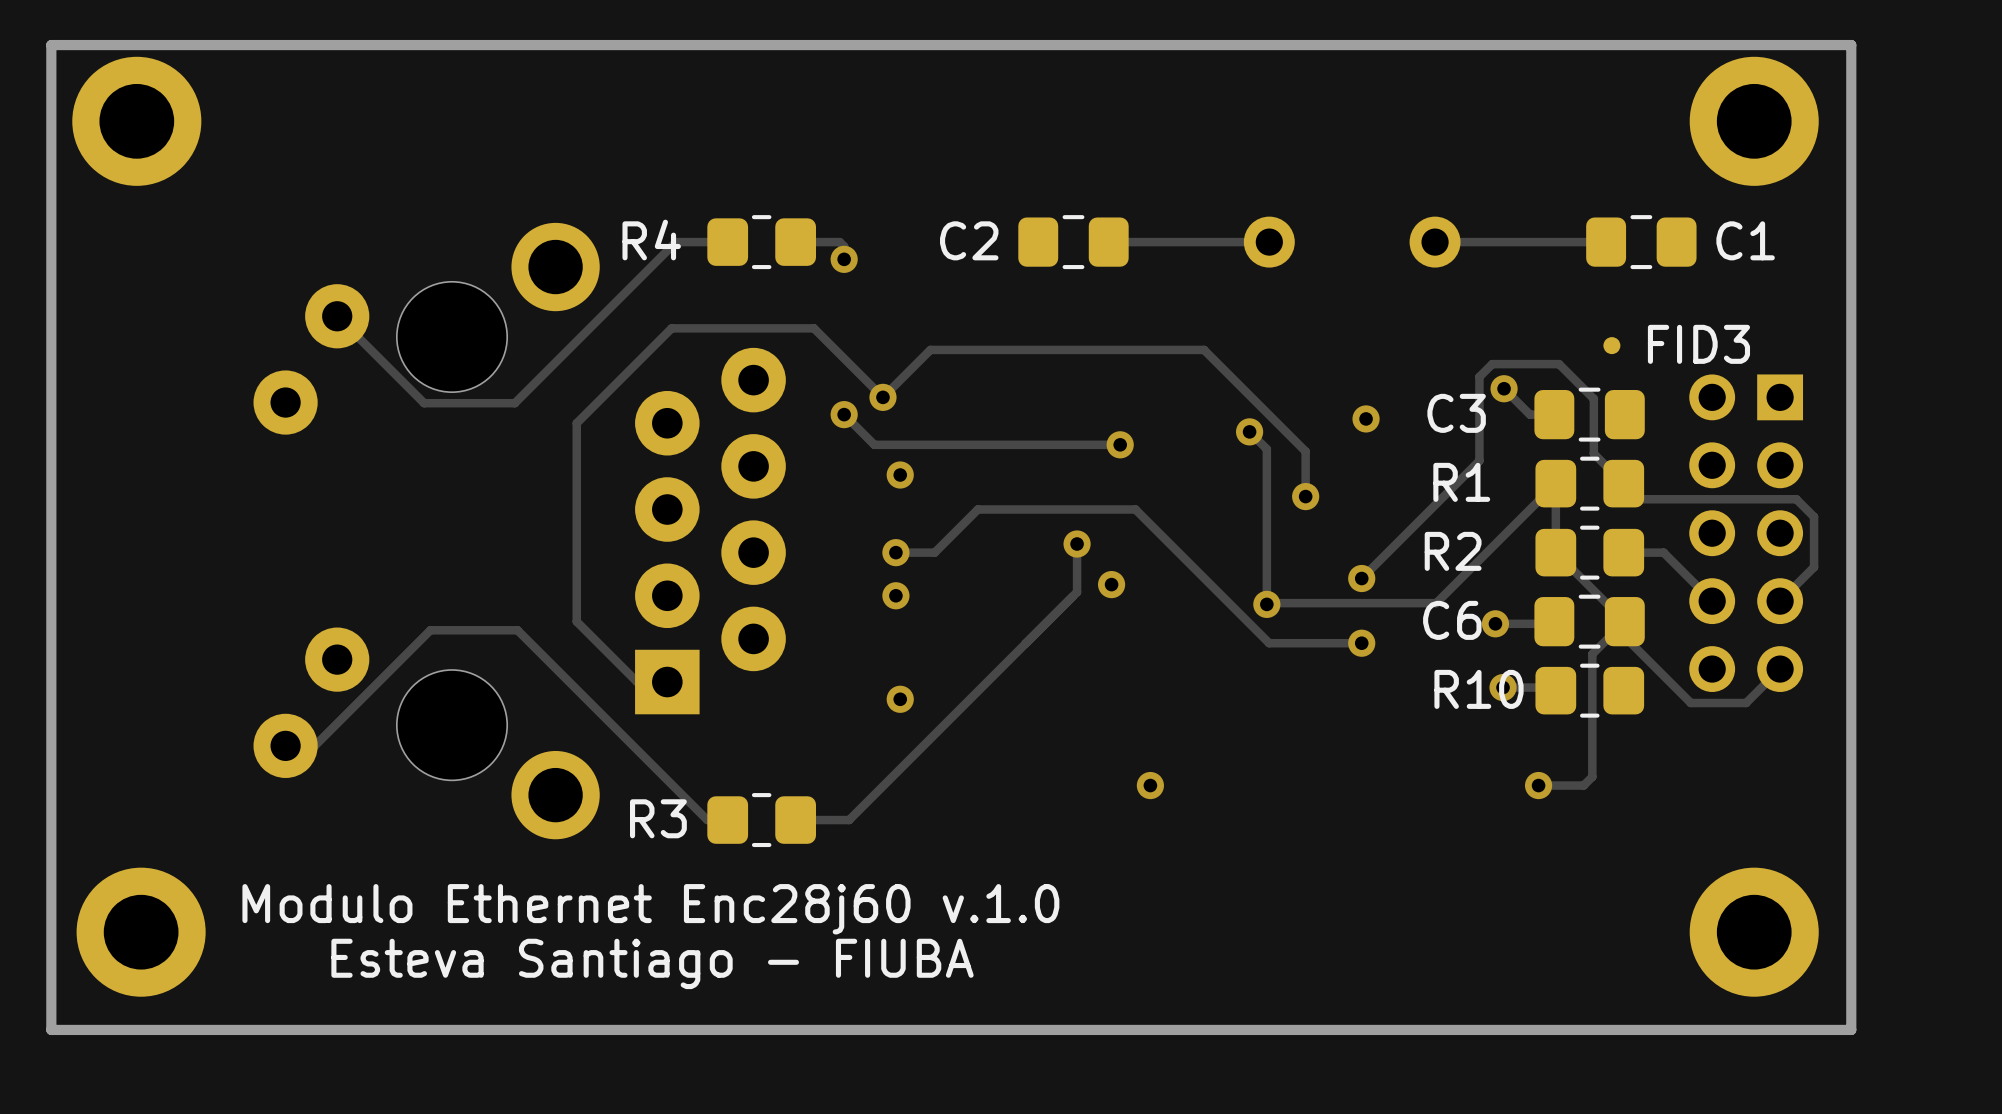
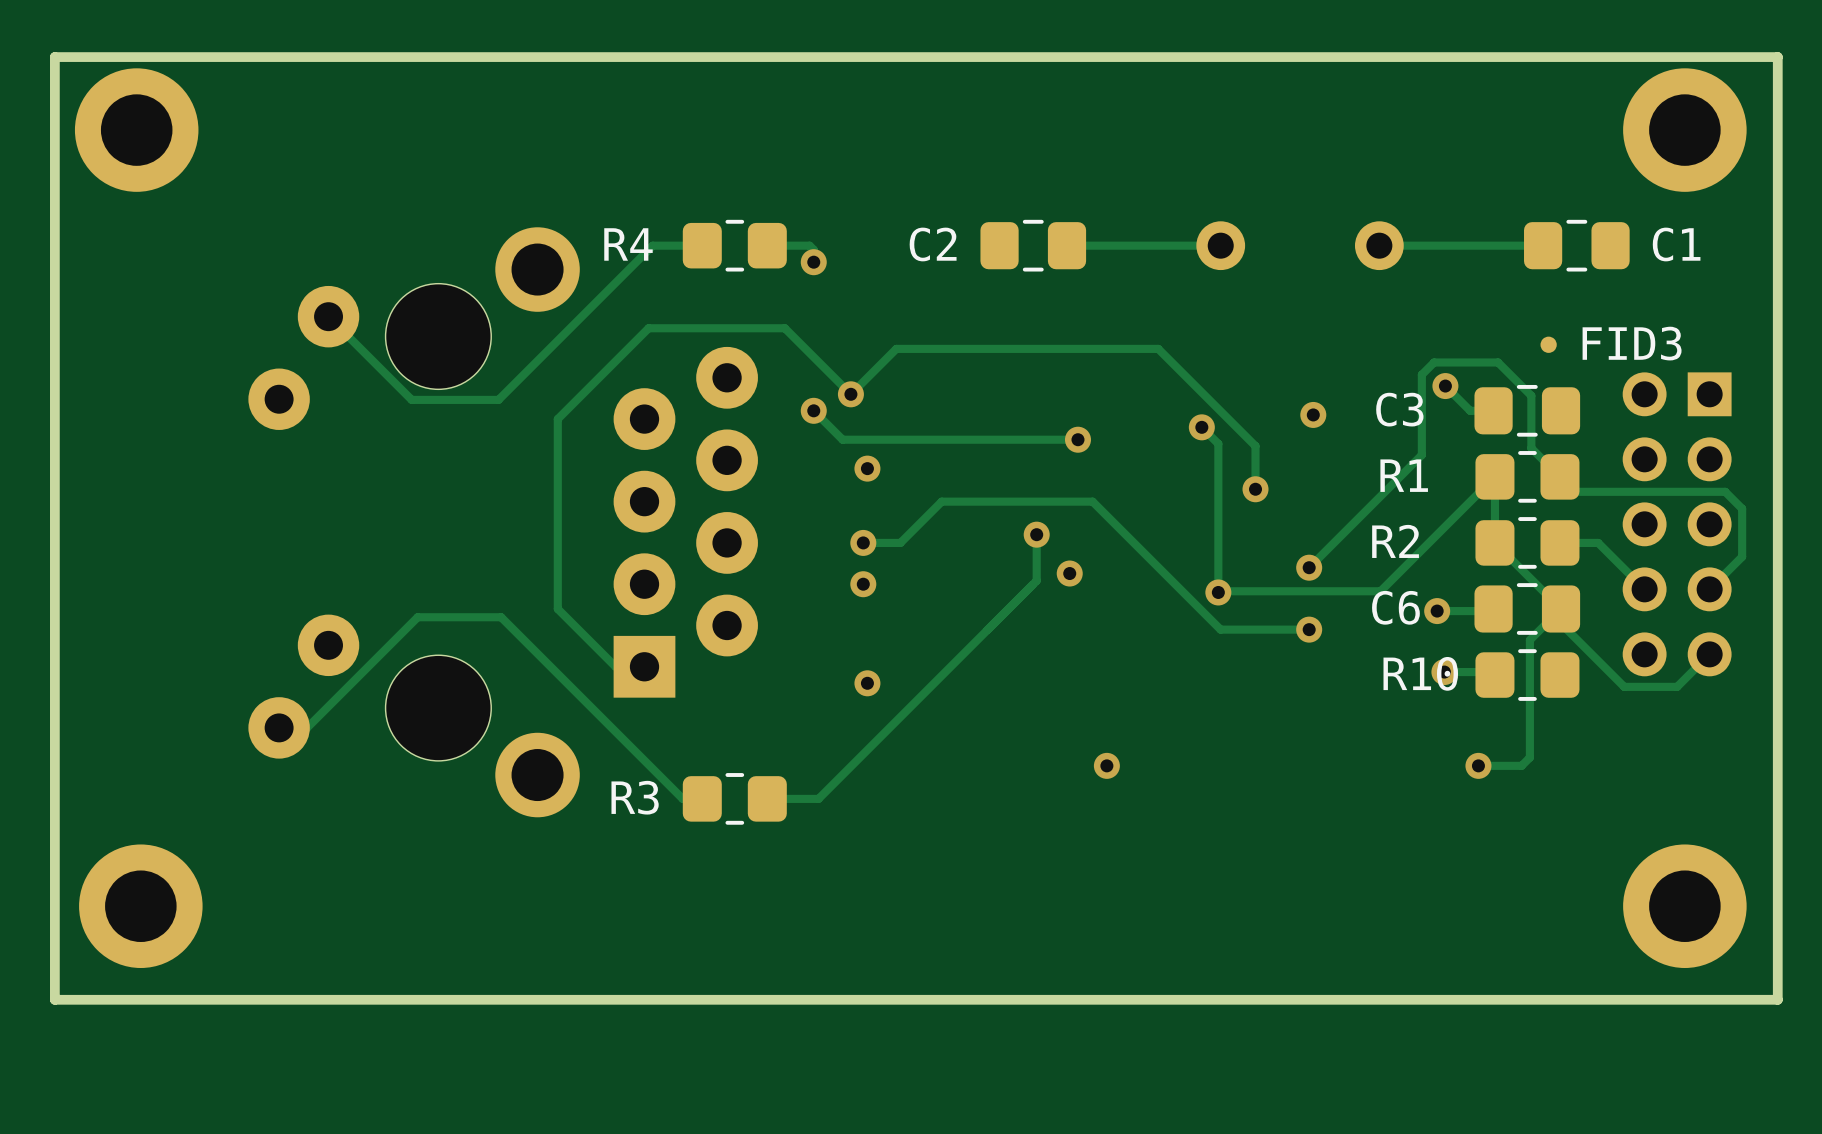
text: Modulo Ethernet Enc28j60 v.1.0 (650, 909) -> none
text: Esteva Santiago - FIUBA (652, 963) -> none

